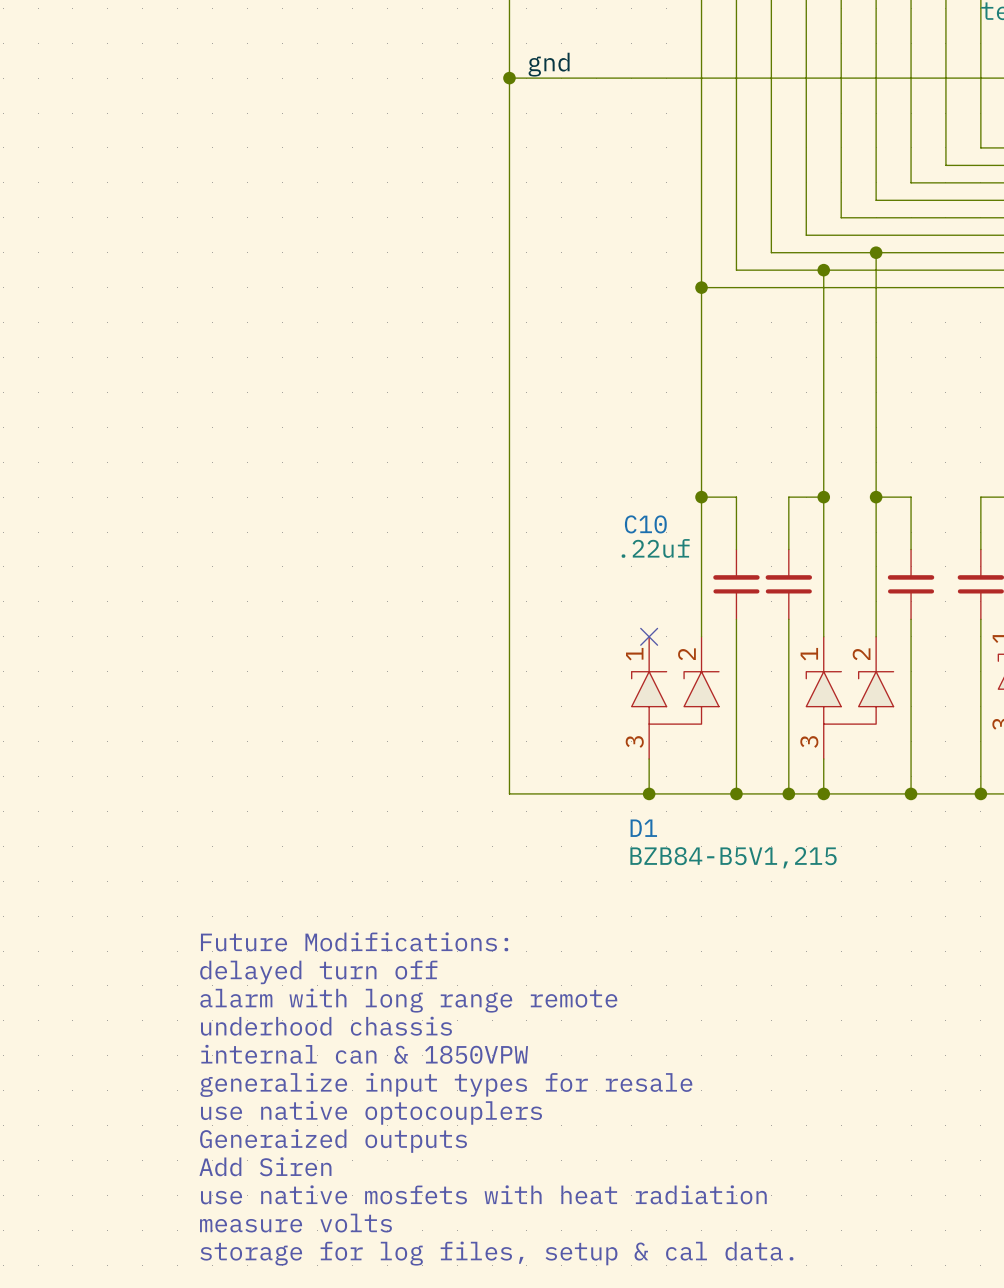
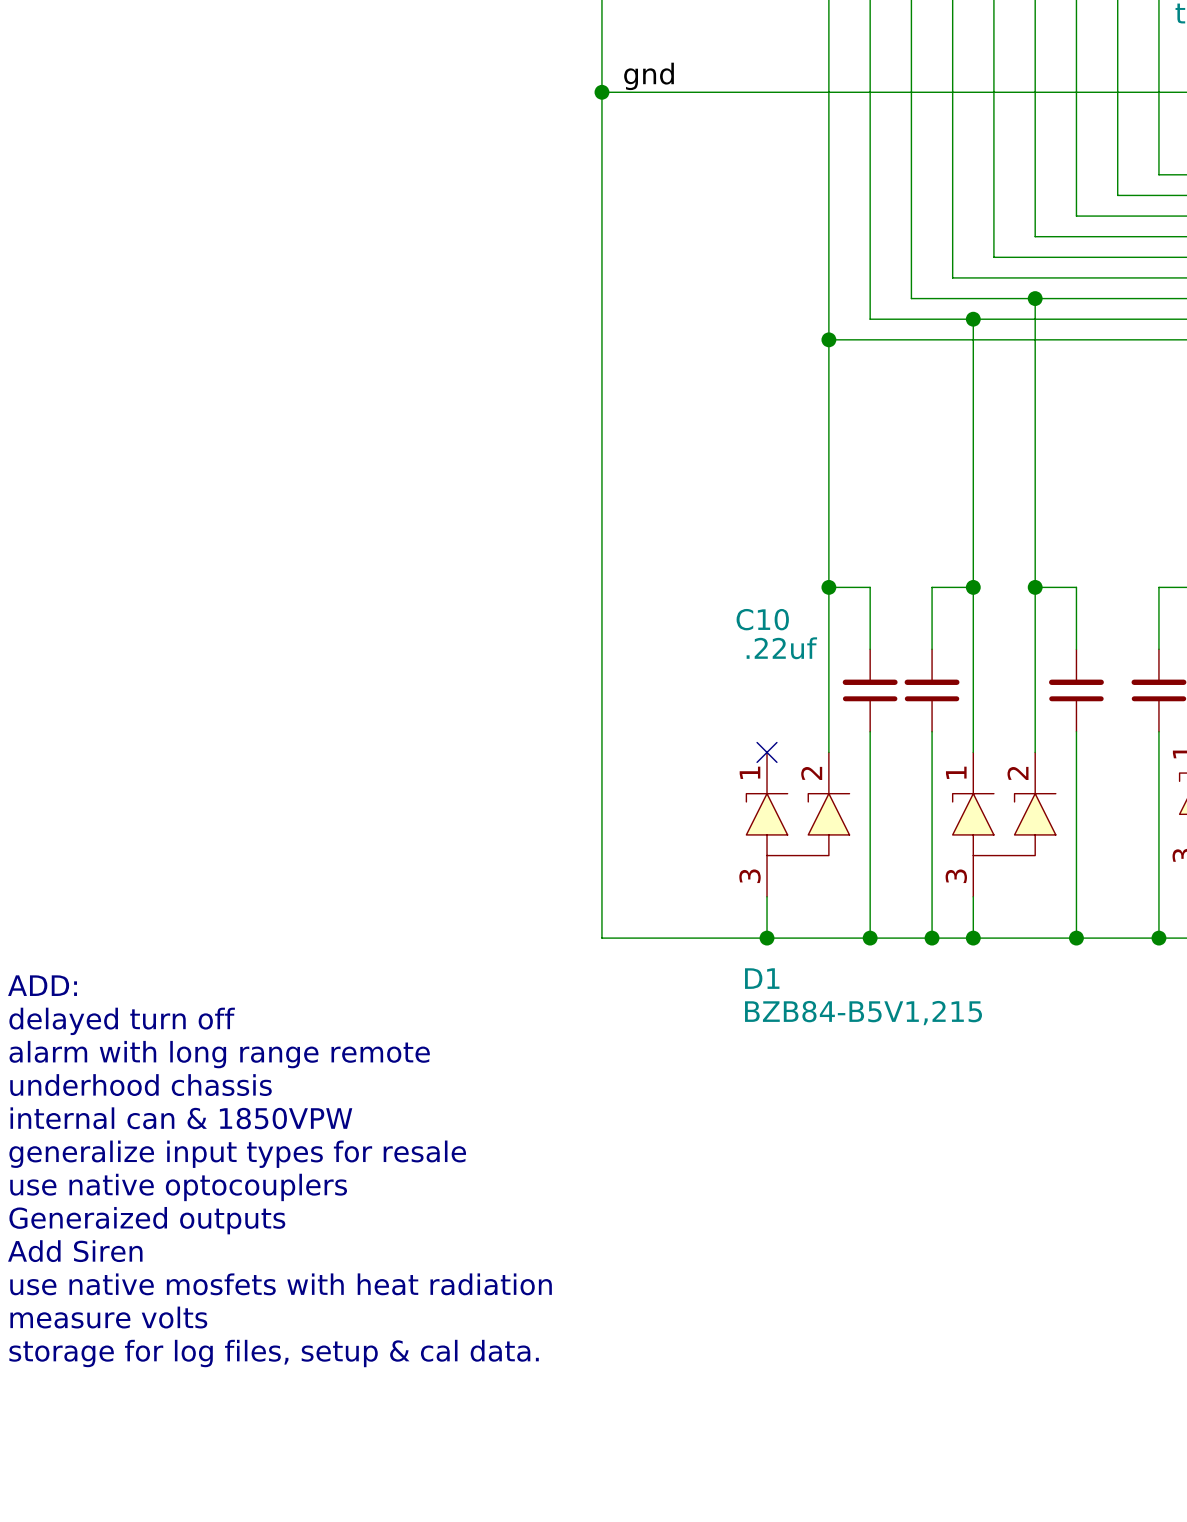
text: none -> ADD: (42, 985)
text: Future Modifications: (354, 941) -> none
text position: delayed turn off (318, 972) -> delayed turn off (122, 1021)
text position: alarm with long range remote (408, 1000) -> alarm with long range remote (219, 1054)
text position: underhood chassis (326, 1026) -> underhood chassis (141, 1085)
text position: internal can & 1850VPW (364, 1054) -> internal can & 1850VPW (181, 1118)
text position: generalize input types for resale (446, 1084) -> generalize input types for resale (237, 1154)
text position: use native optocouplers (371, 1112) -> use native optocouplers (178, 1187)
text position: Generaized outputs (333, 1141) -> Generaized outputs (147, 1220)
text position: Add Siren (265, 1166) -> Add Siren (75, 1251)
text position: use native mosfets with heat radiation (483, 1194) -> use native mosfets with heat radiation (281, 1284)
text position: measure volts (295, 1223) -> measure volts (108, 1317)
text position: storage for log files, setup & cal data. (496, 1253) -> storage for log files, setup & cal data. (274, 1353)

